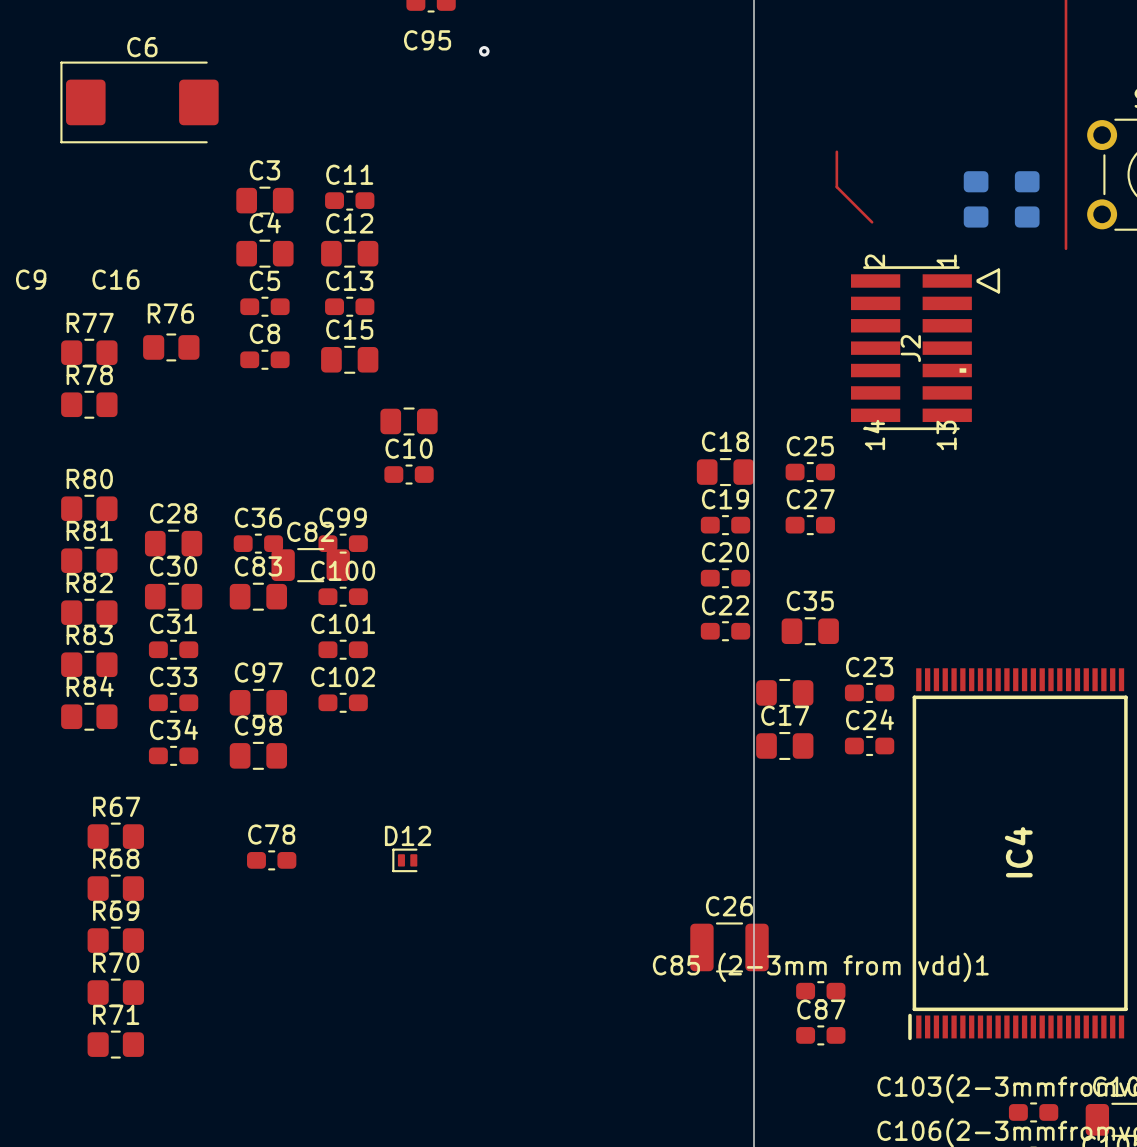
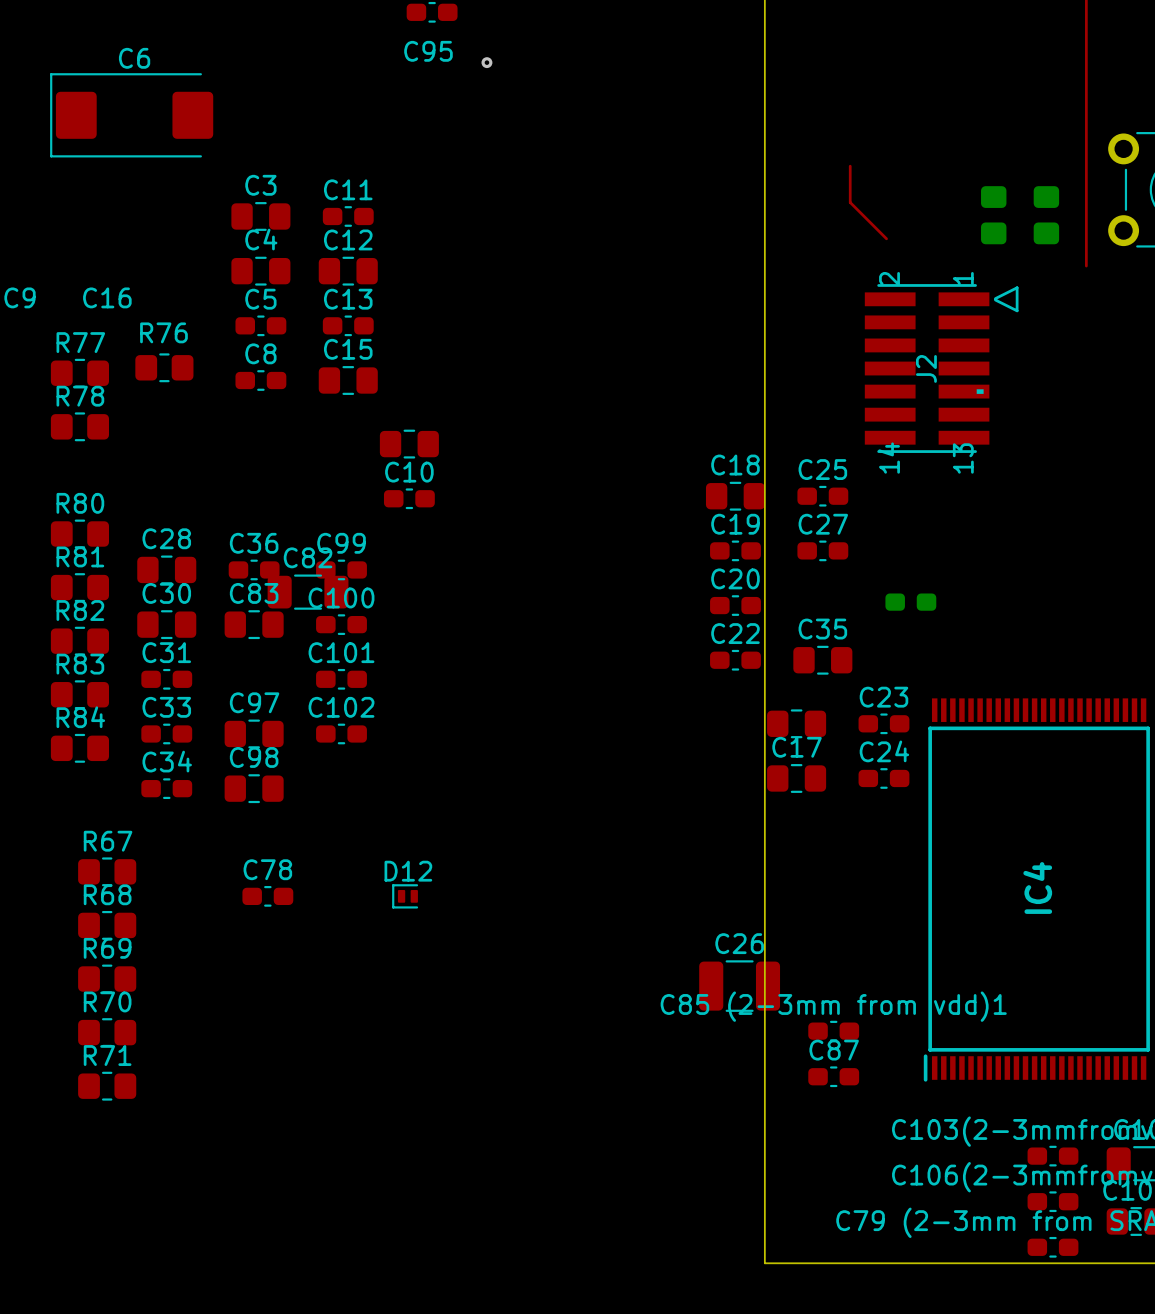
part: none -> (910, 602)

